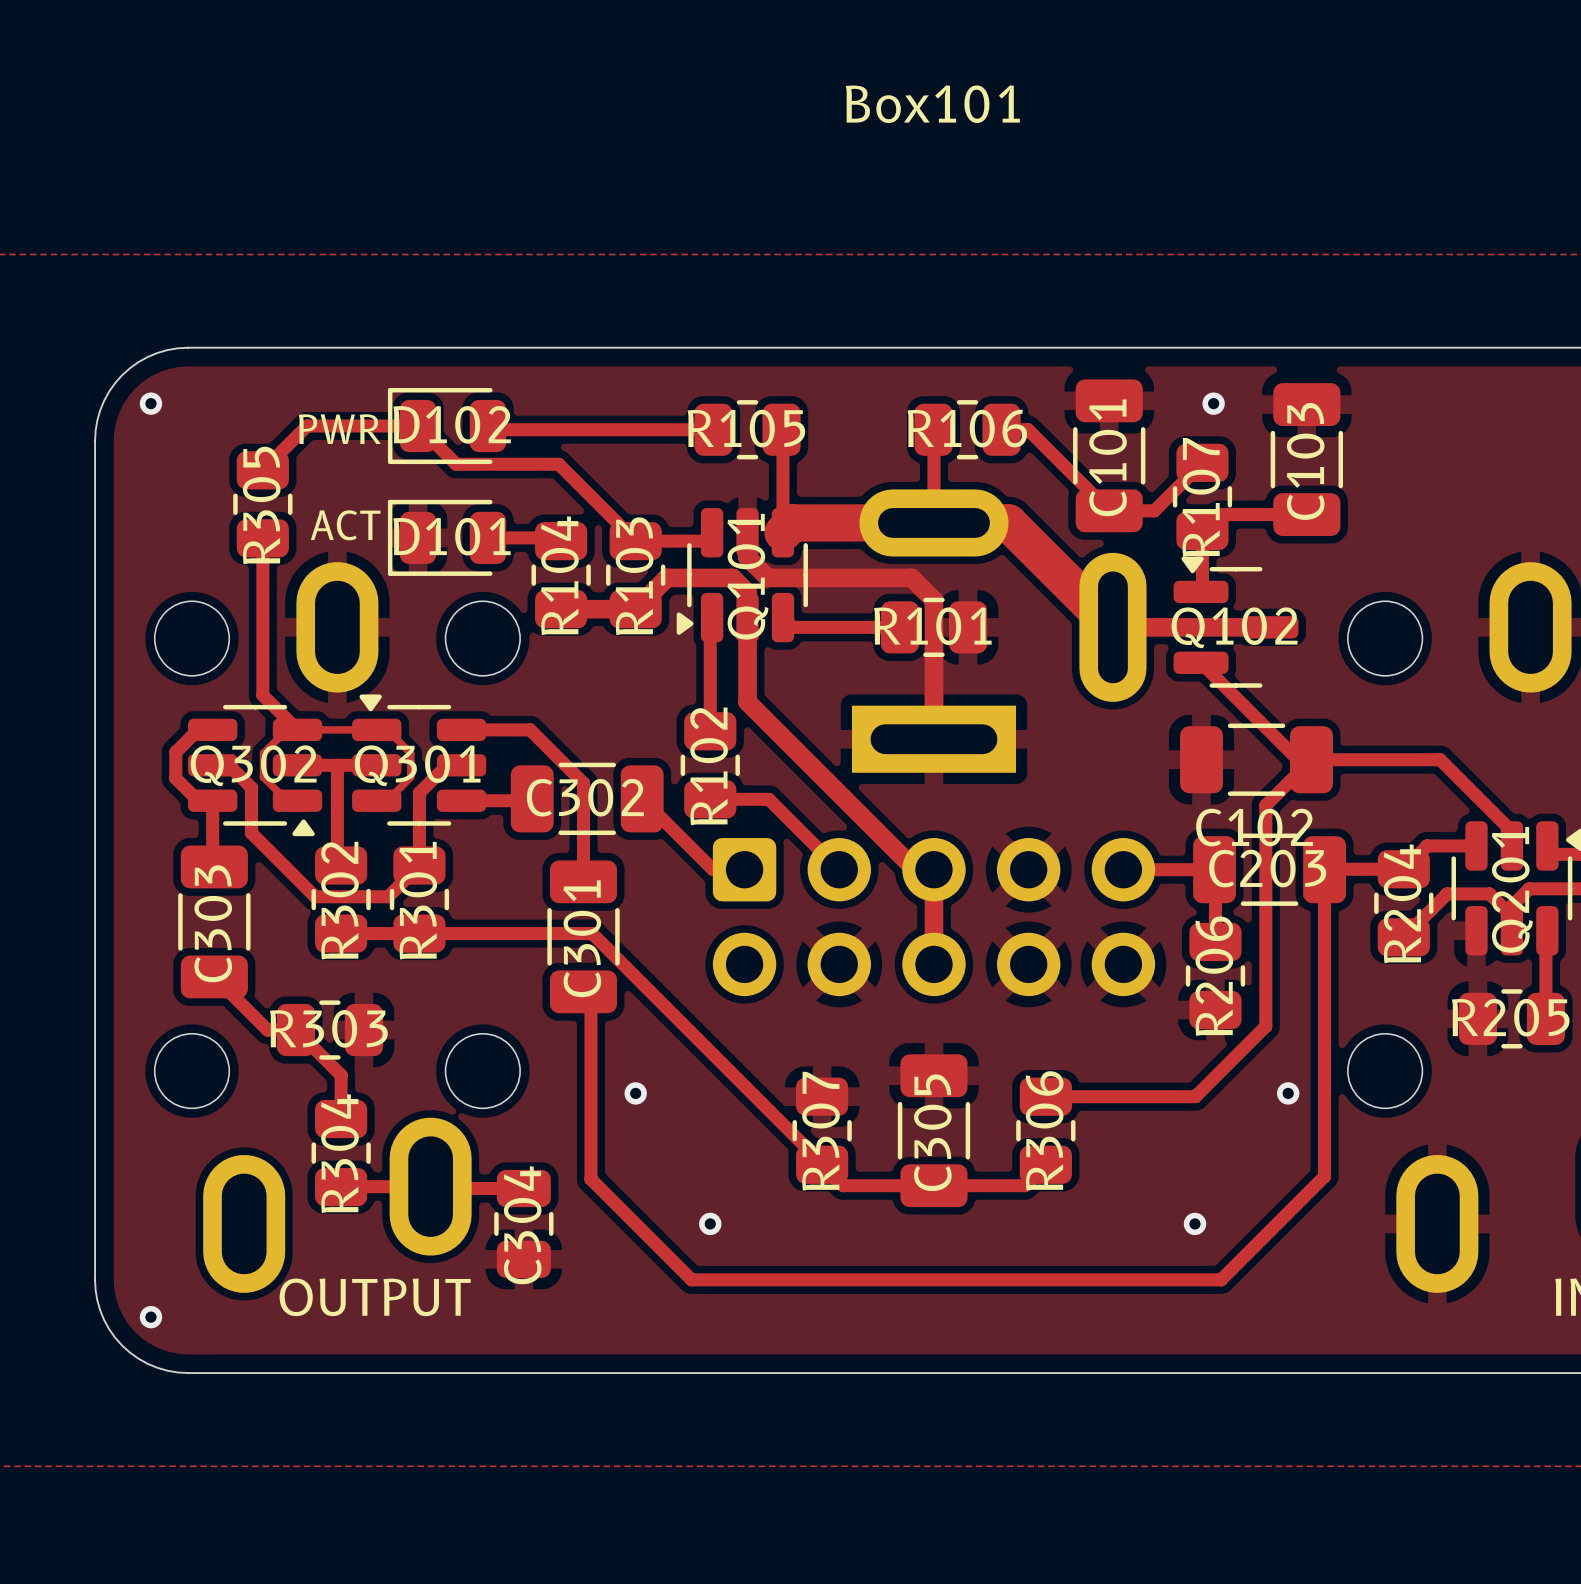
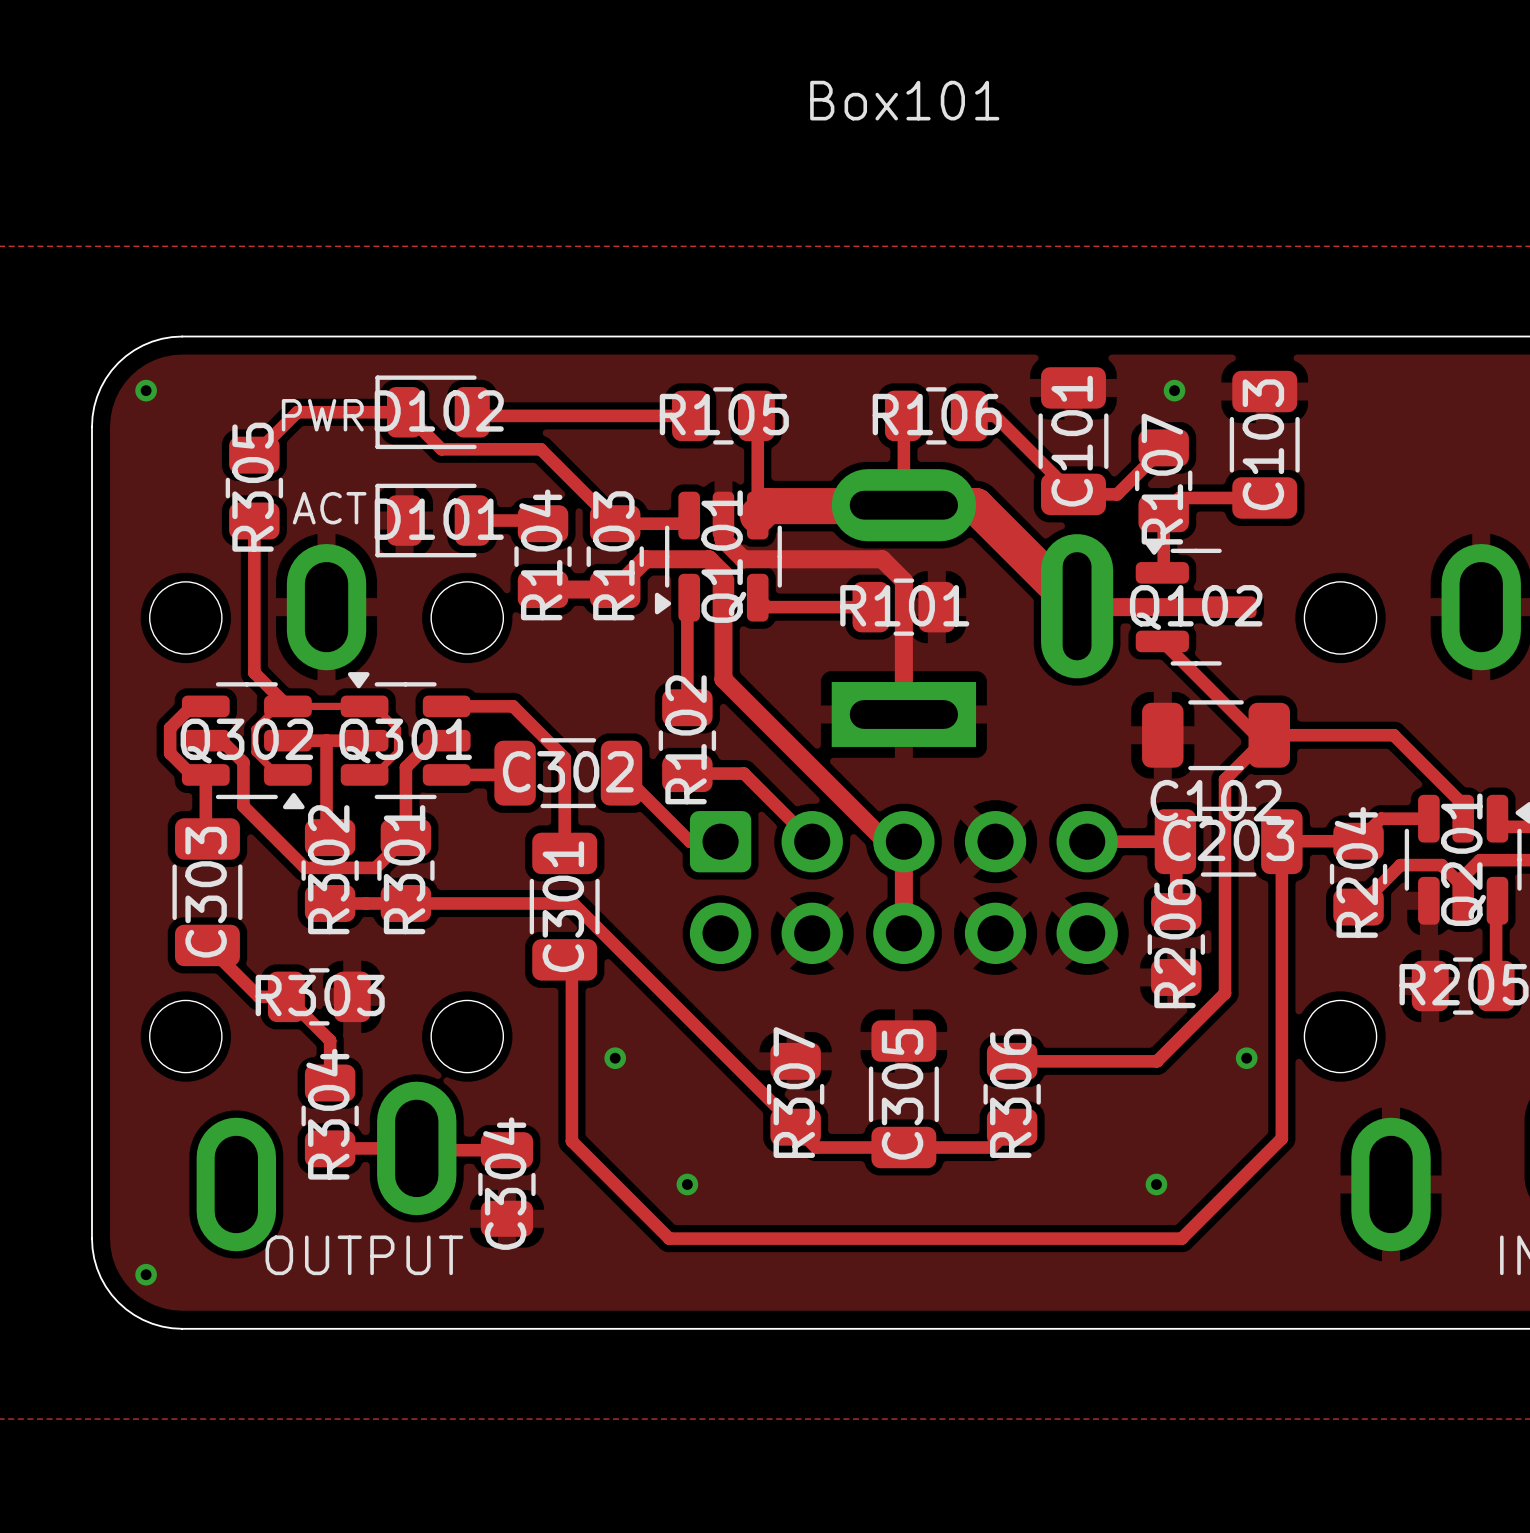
part footprint: [851, 489, 1147, 773] -> [831, 469, 1114, 747]

